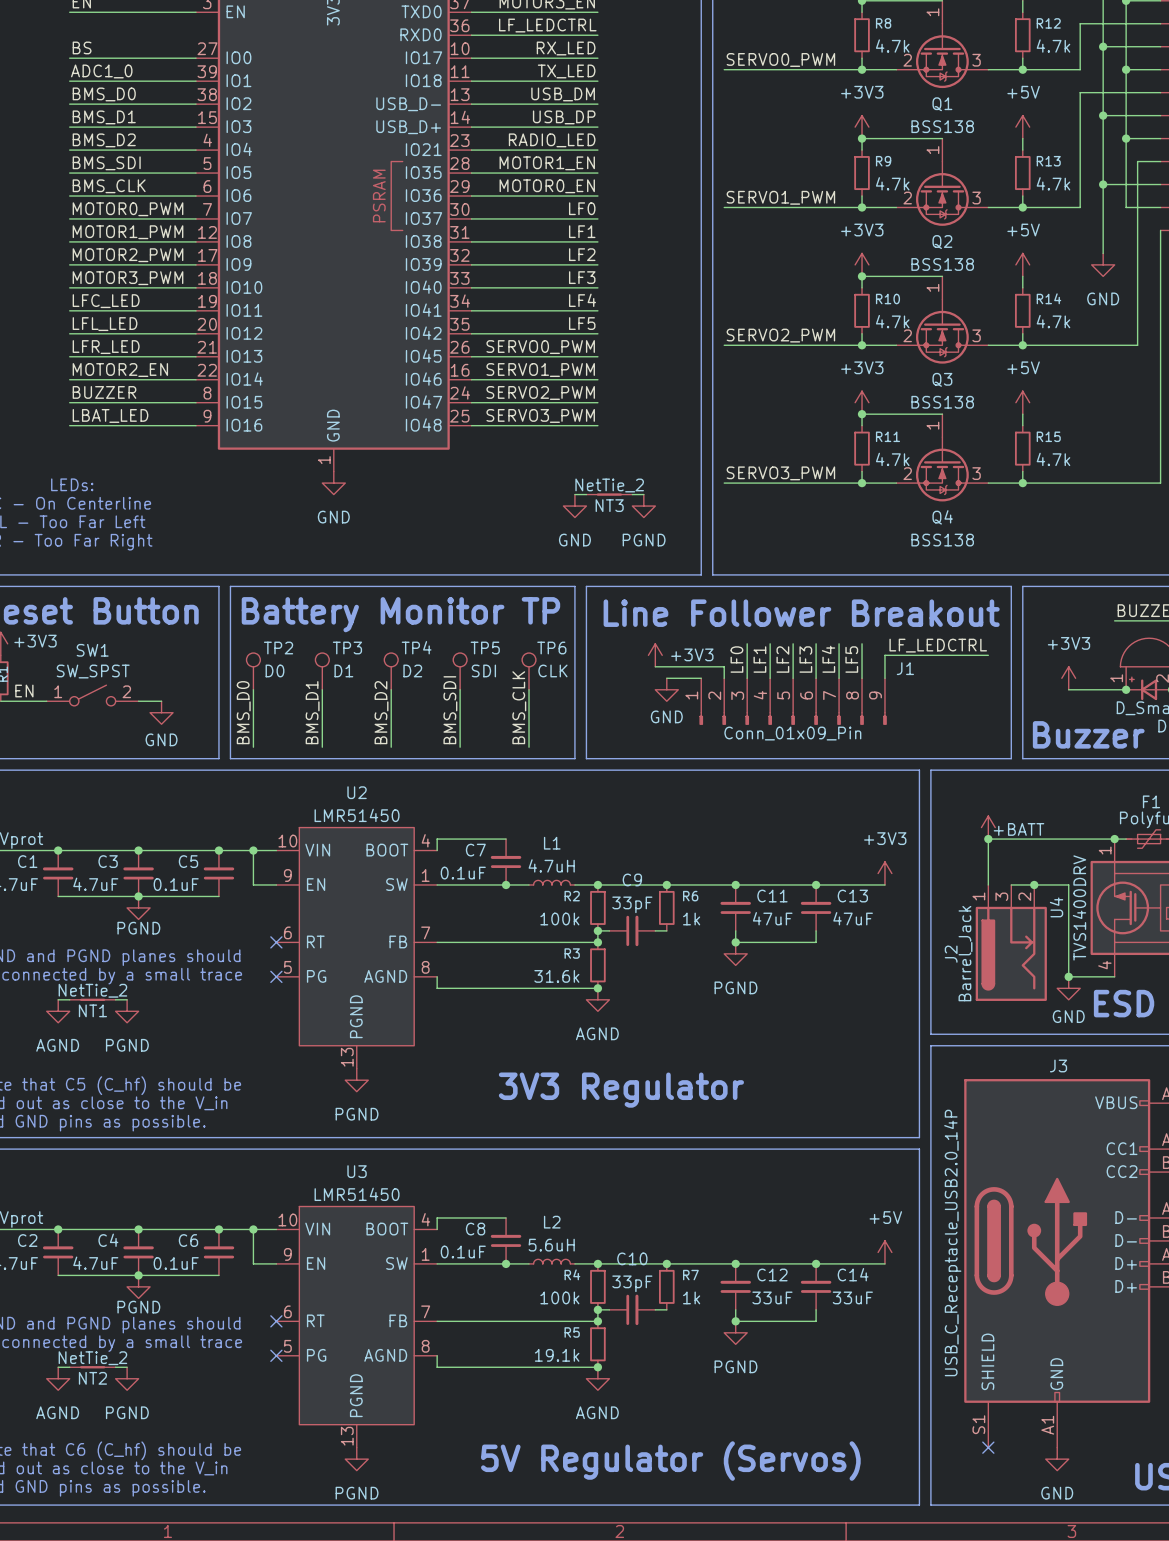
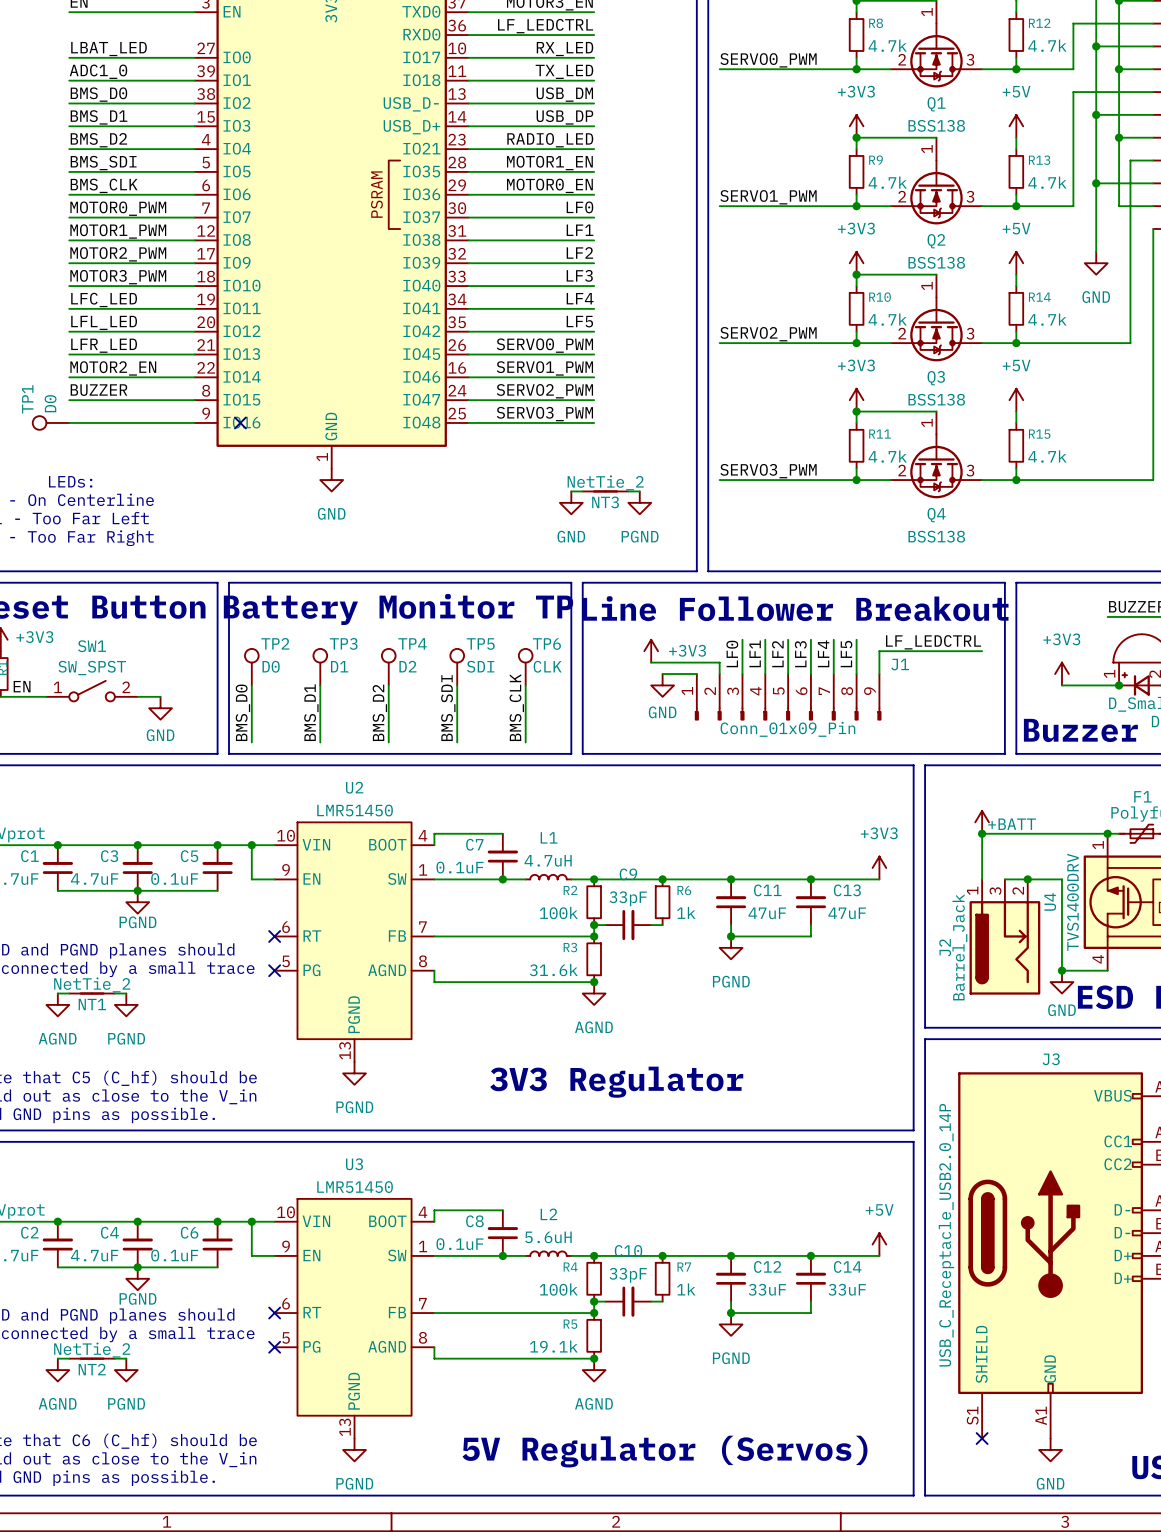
label: BS (82, 47) -> LBAT_LED (109, 49)
label: LBAT_LED (110, 415) -> none
TP1: none -> D0 (50, 422)
no-connect mark: none -> (240, 422)

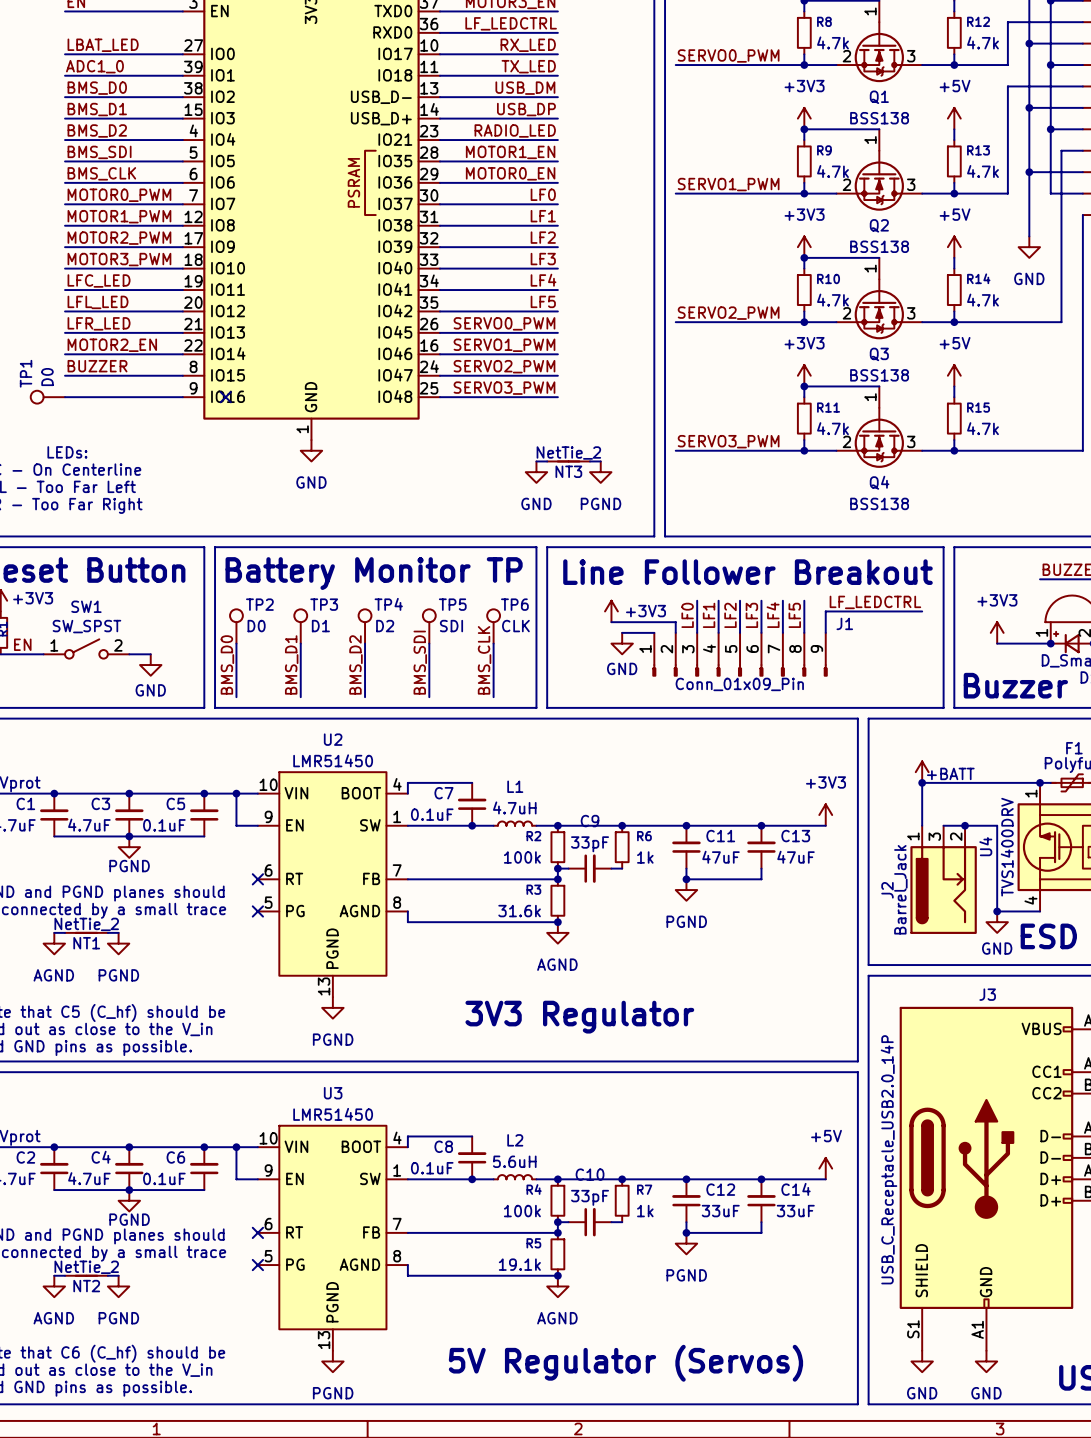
no-connect mark: (982, 1438) -> none
power symbol: none -> GND (922, 1361)

